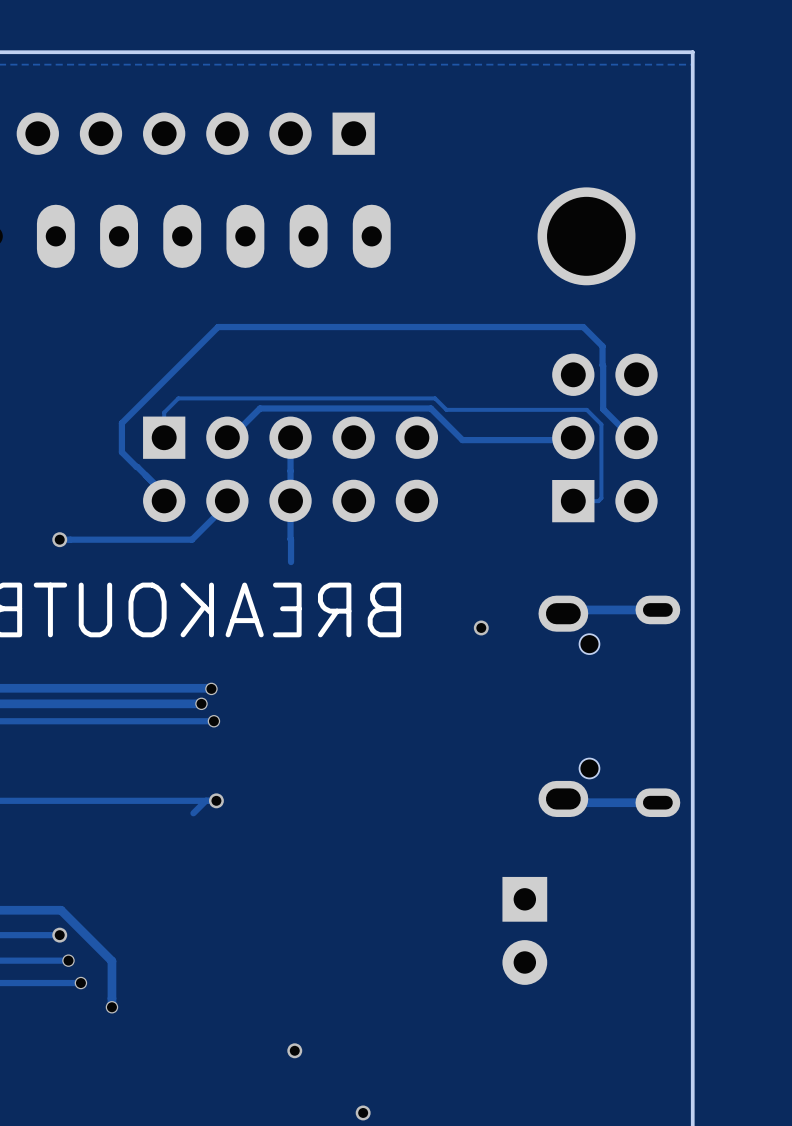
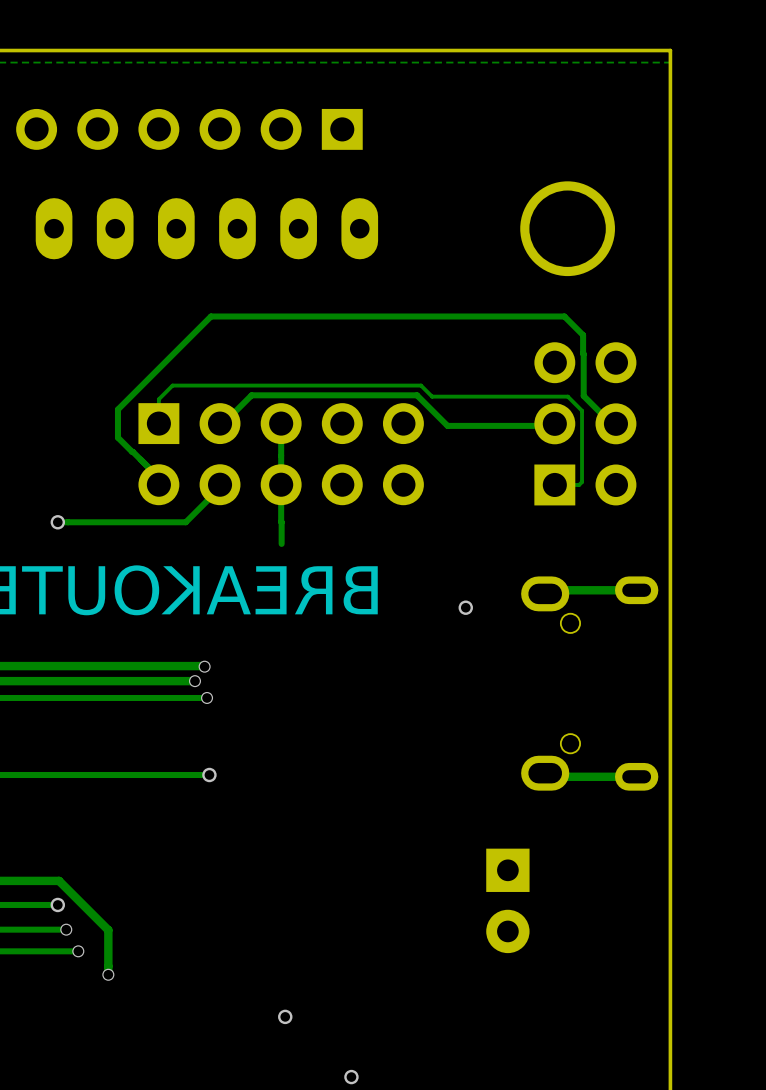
track: (205, 800) (193, 813) -> none

